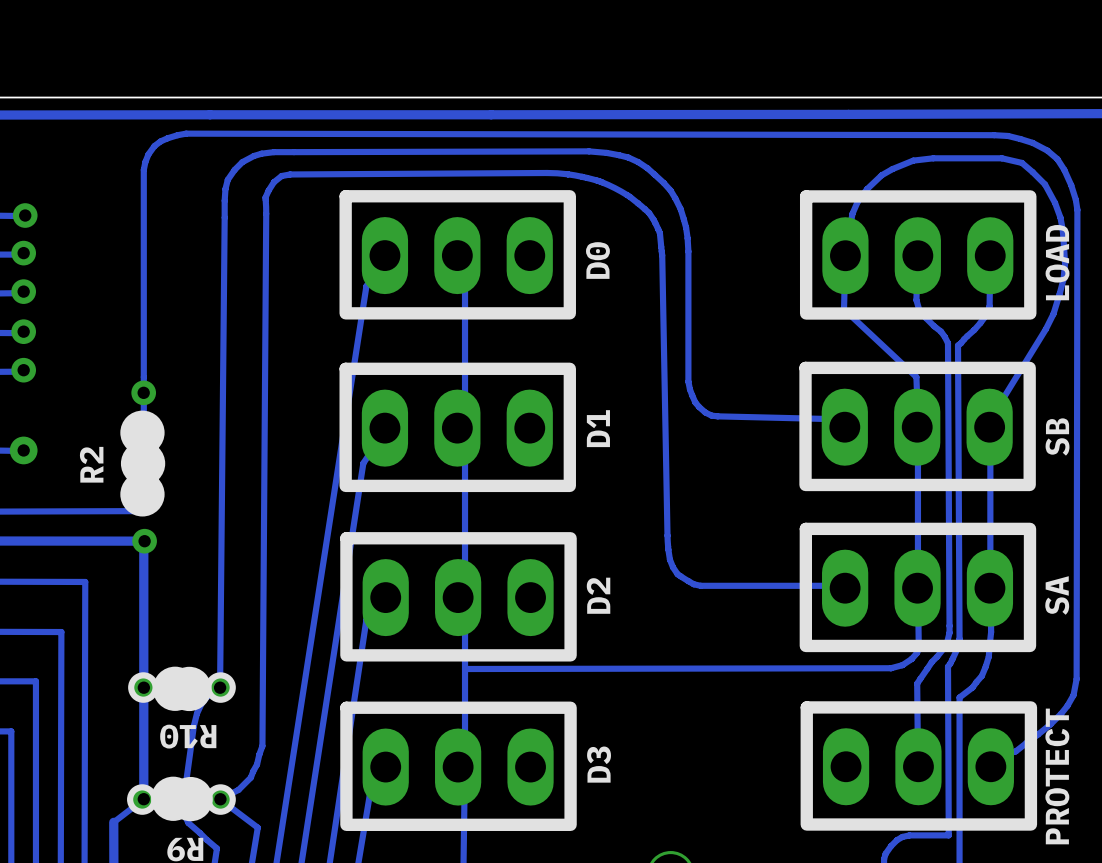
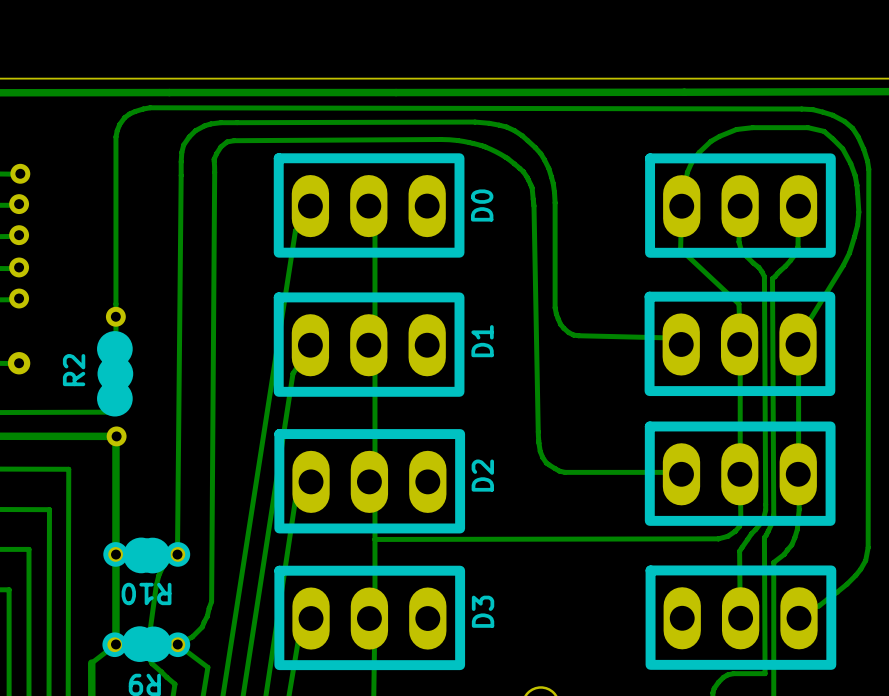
text: LOAD (1057, 262) -> none
text: SB (1057, 436) -> none
text: SA (1057, 595) -> none
text: PROTECT (1057, 776) -> none

